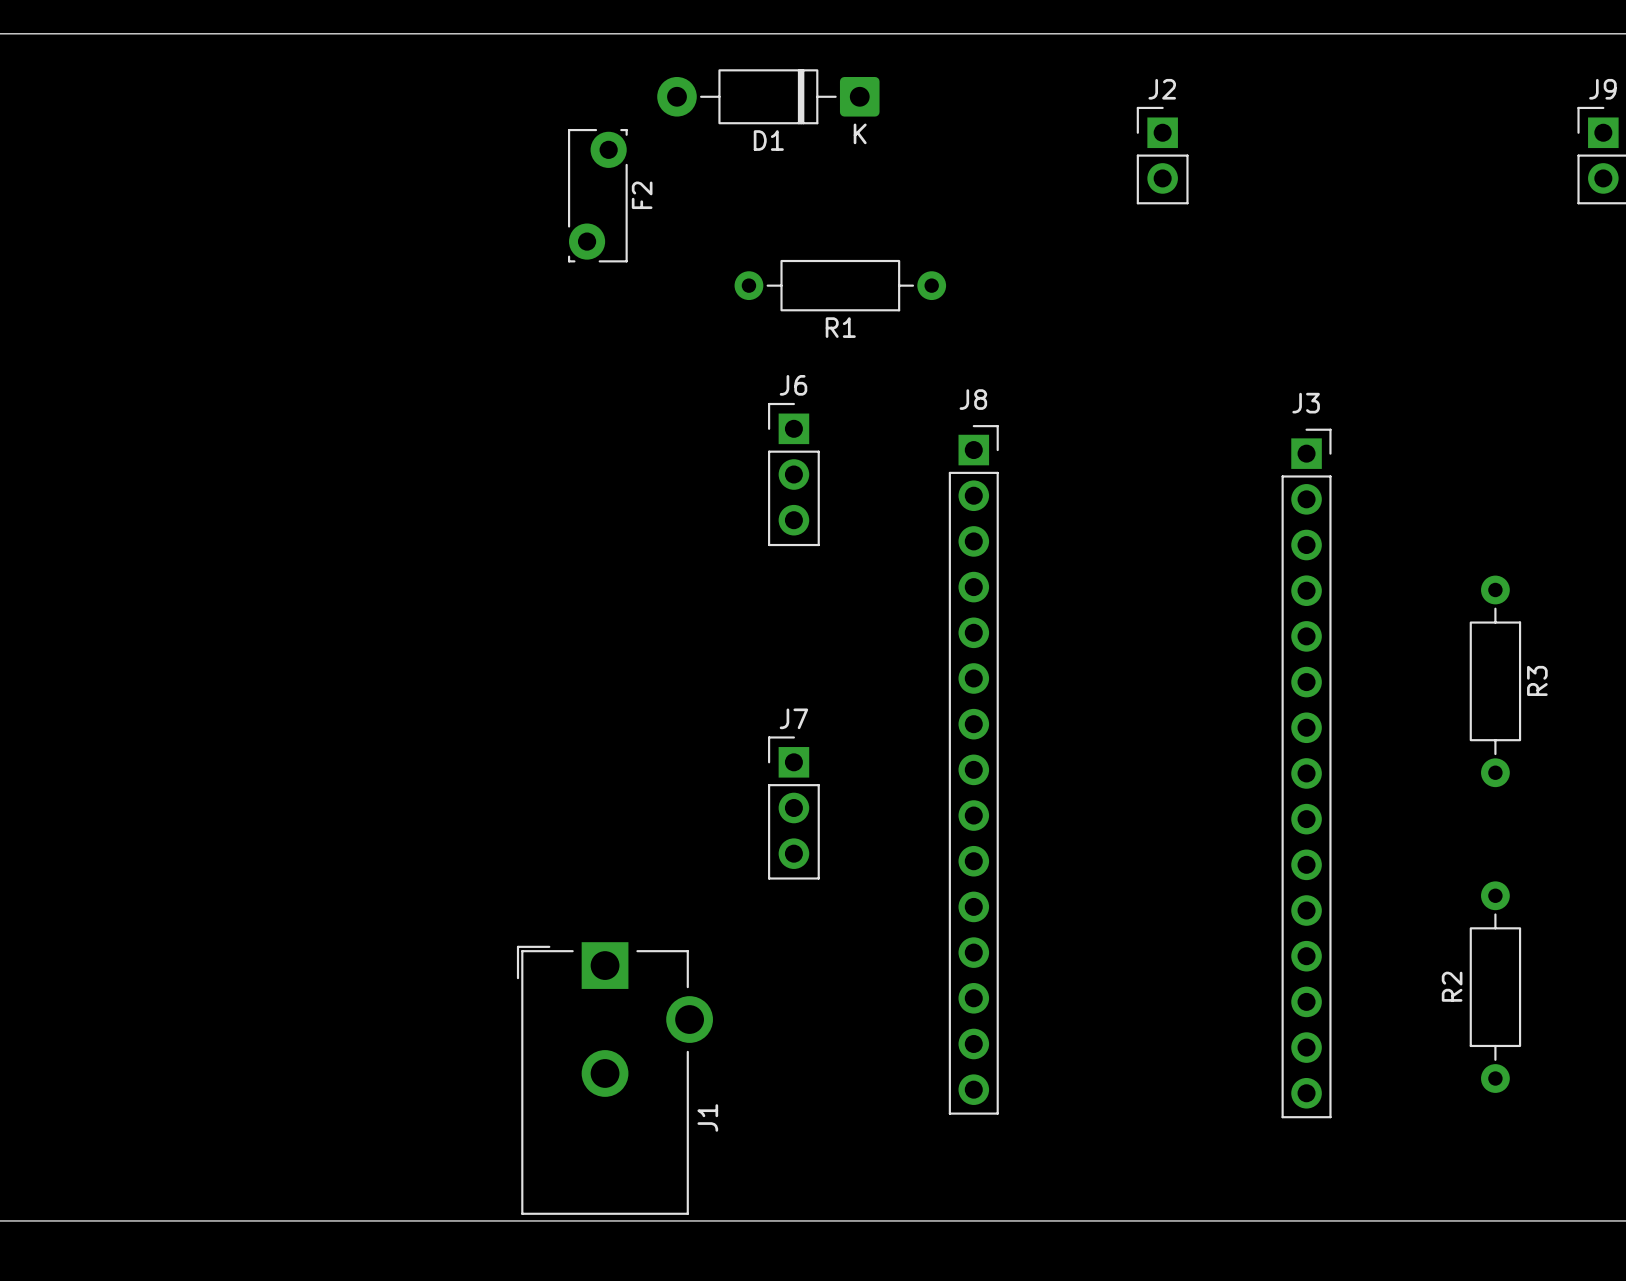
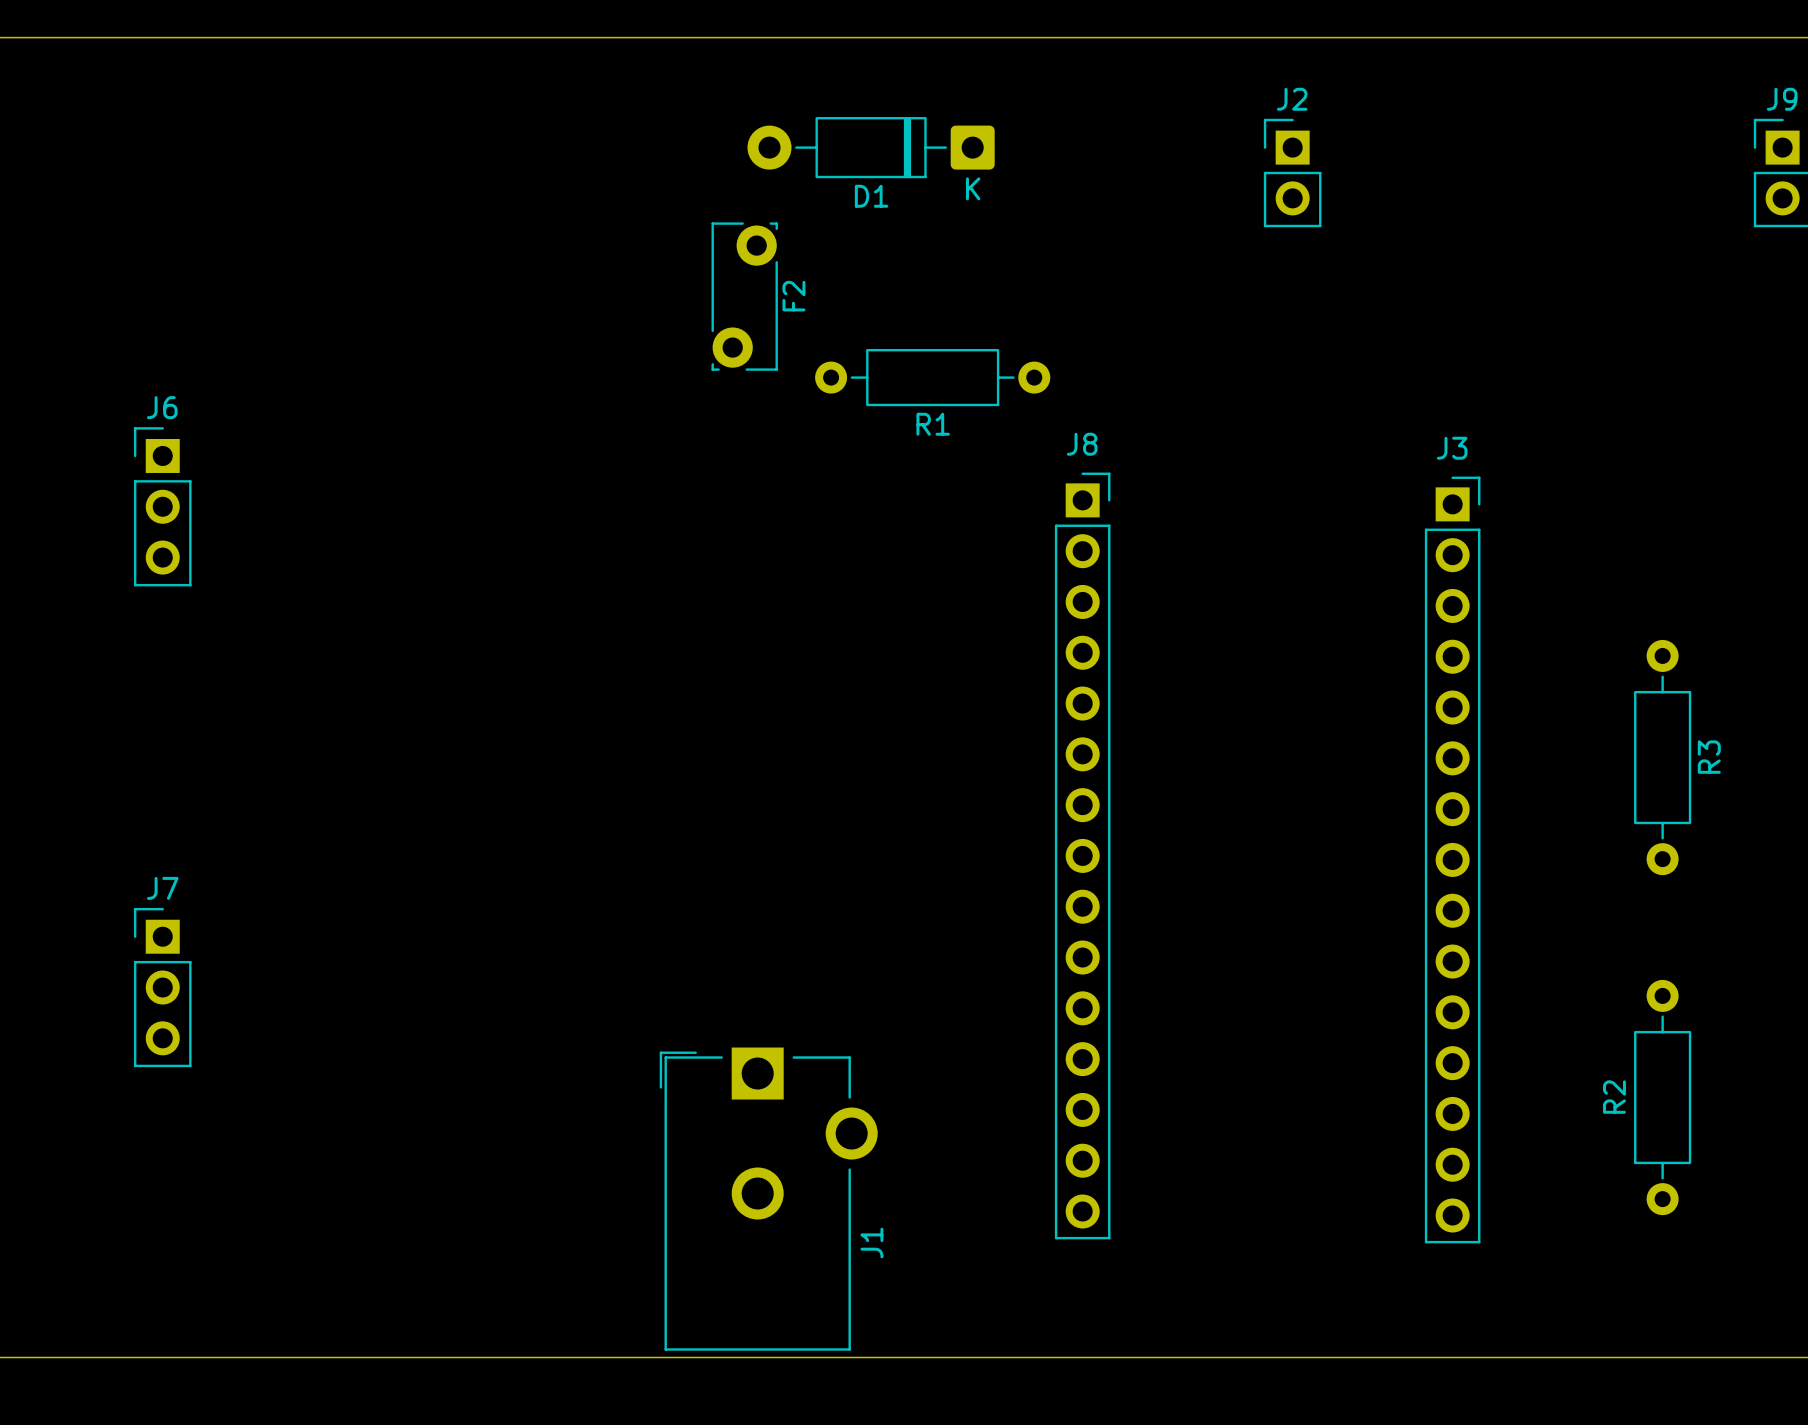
D1 position: (768, 96) -> (871, 147)
F2 position: (597, 195) -> (744, 296)
R1 position: (840, 285) -> (932, 377)
J6 position: (793, 474) -> (162, 506)
J7 position: (793, 807) -> (162, 987)
J1 position: (614, 1078) -> (768, 1199)

